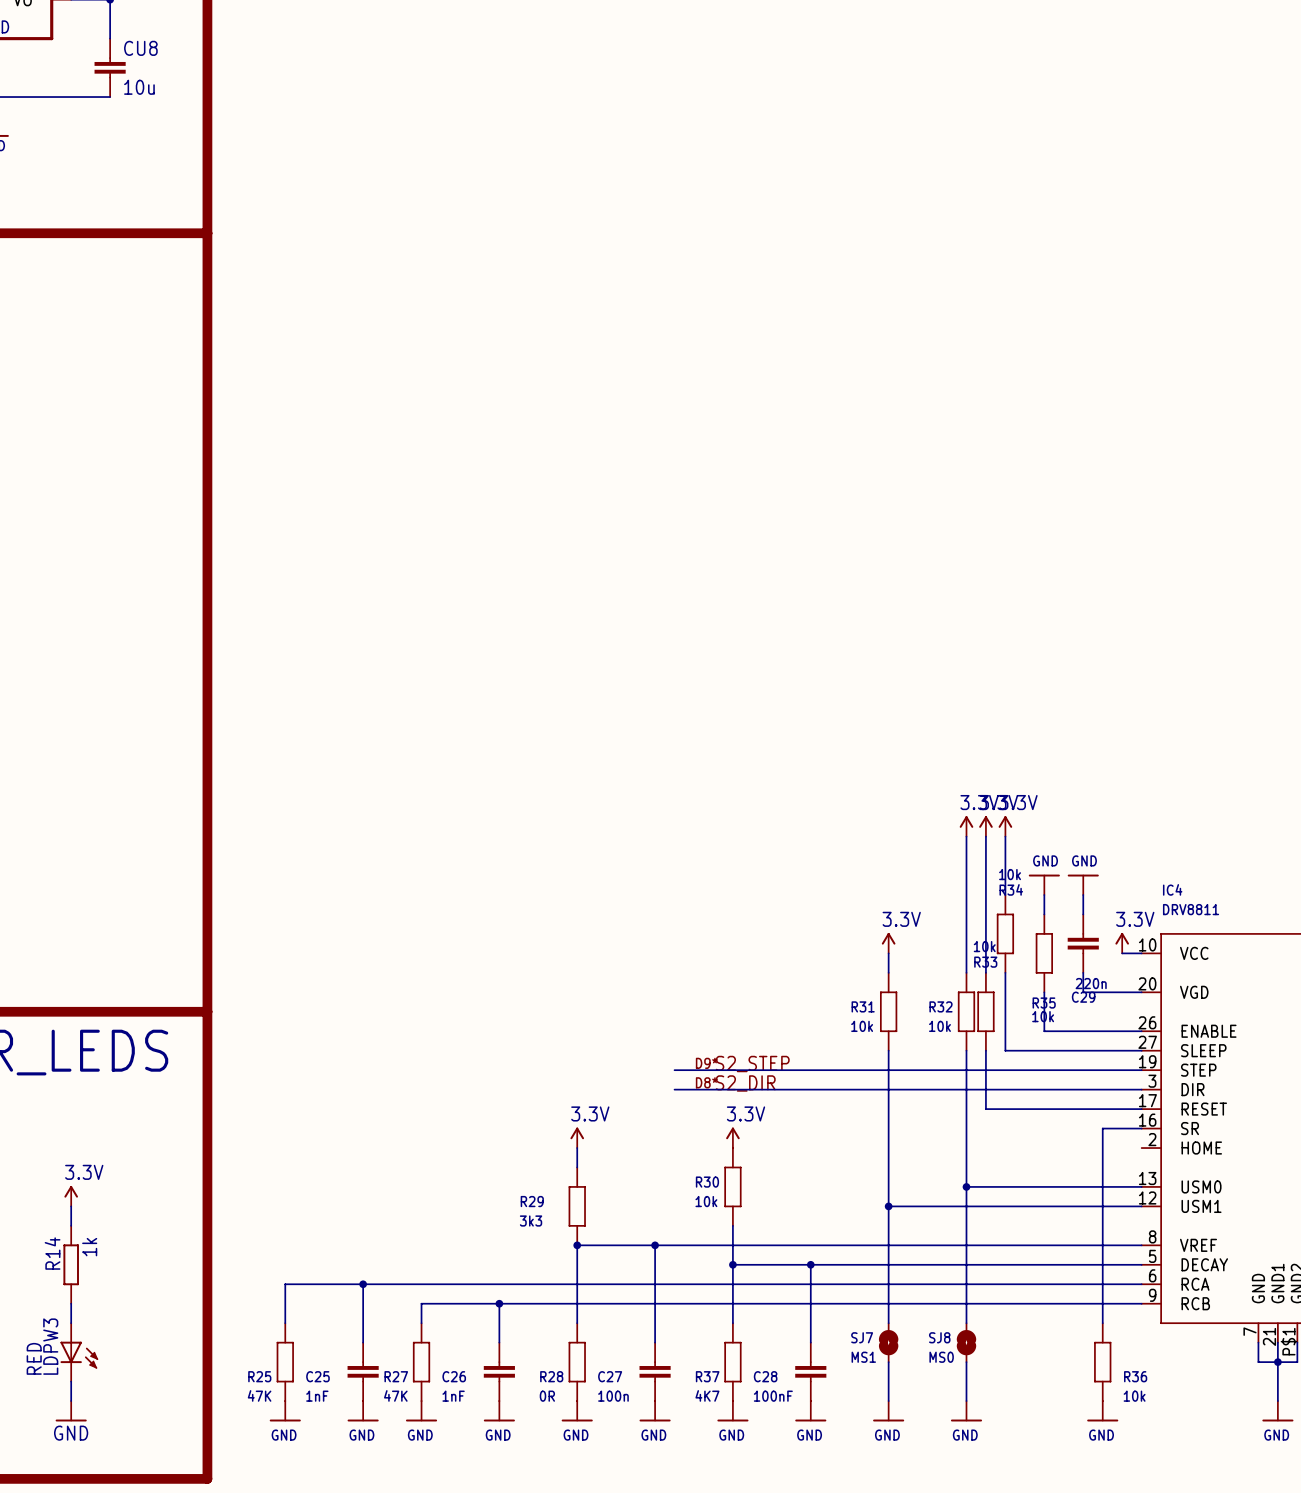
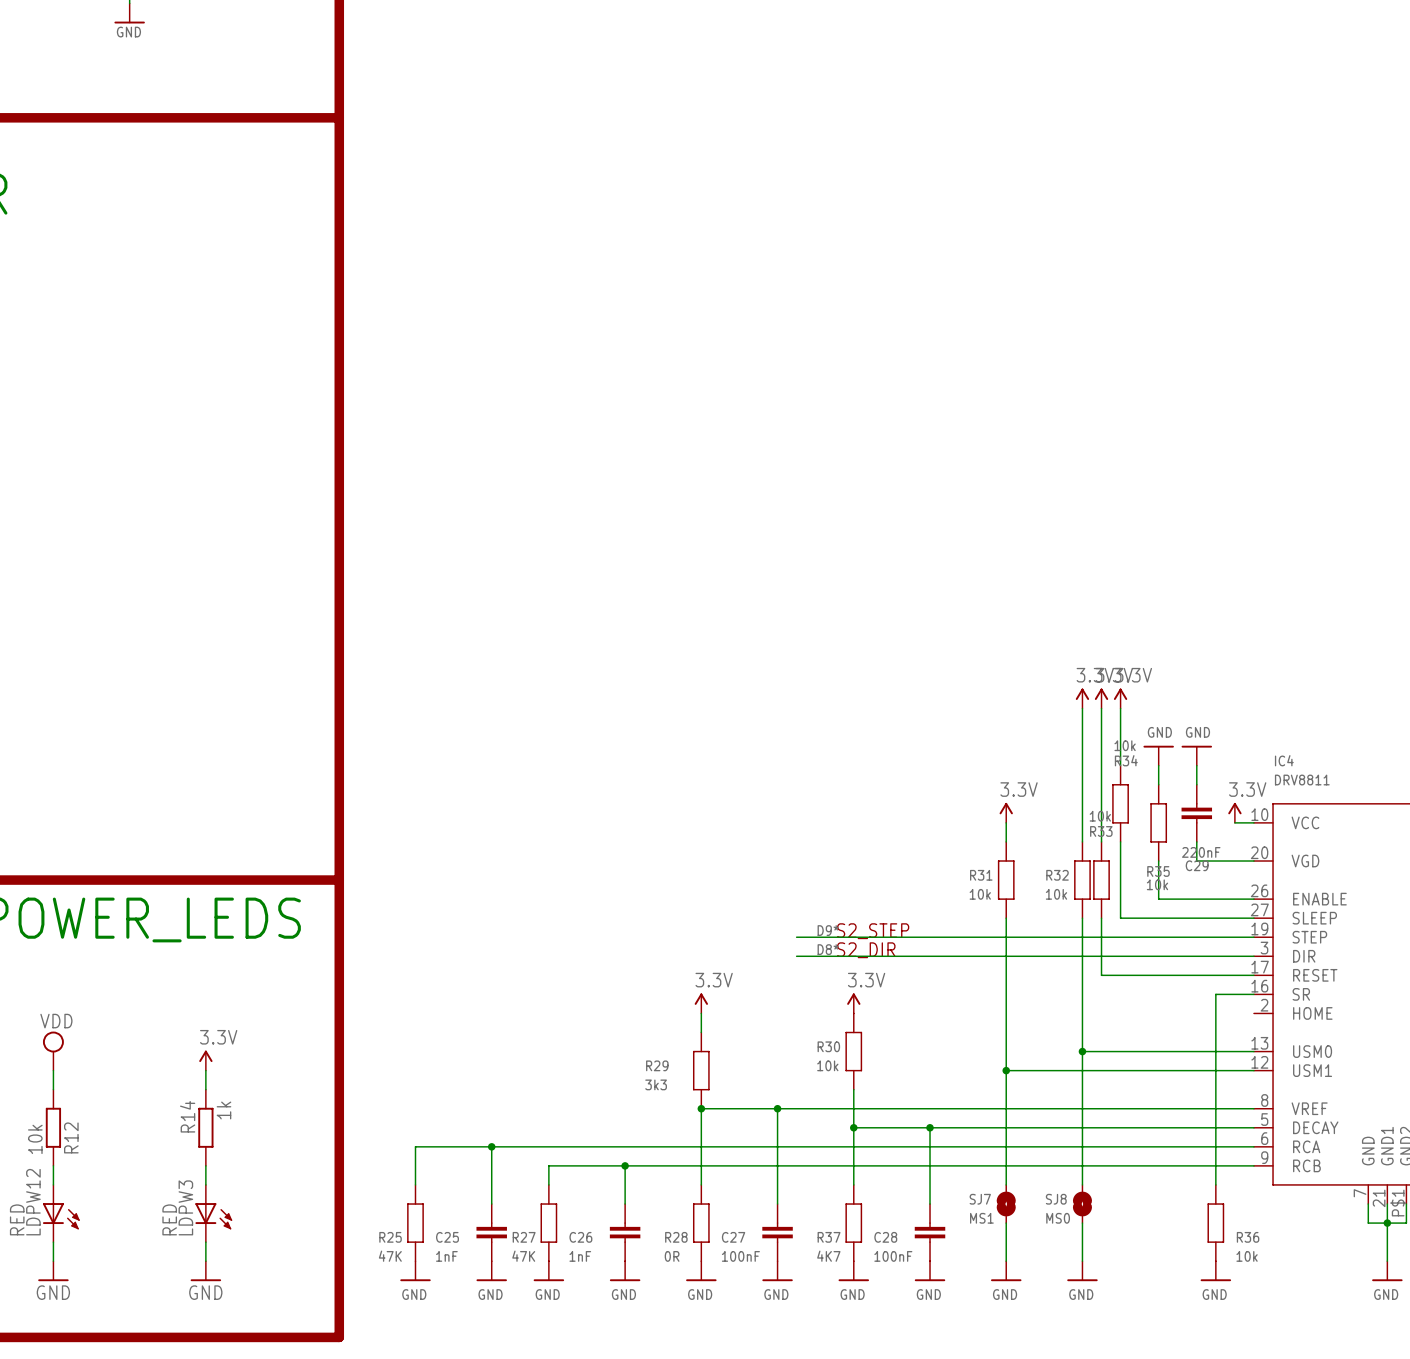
C29 value: 220n (1091, 983) -> 220nF (1201, 852)
C27 value: 100n (613, 1396) -> 100nF (740, 1256)

